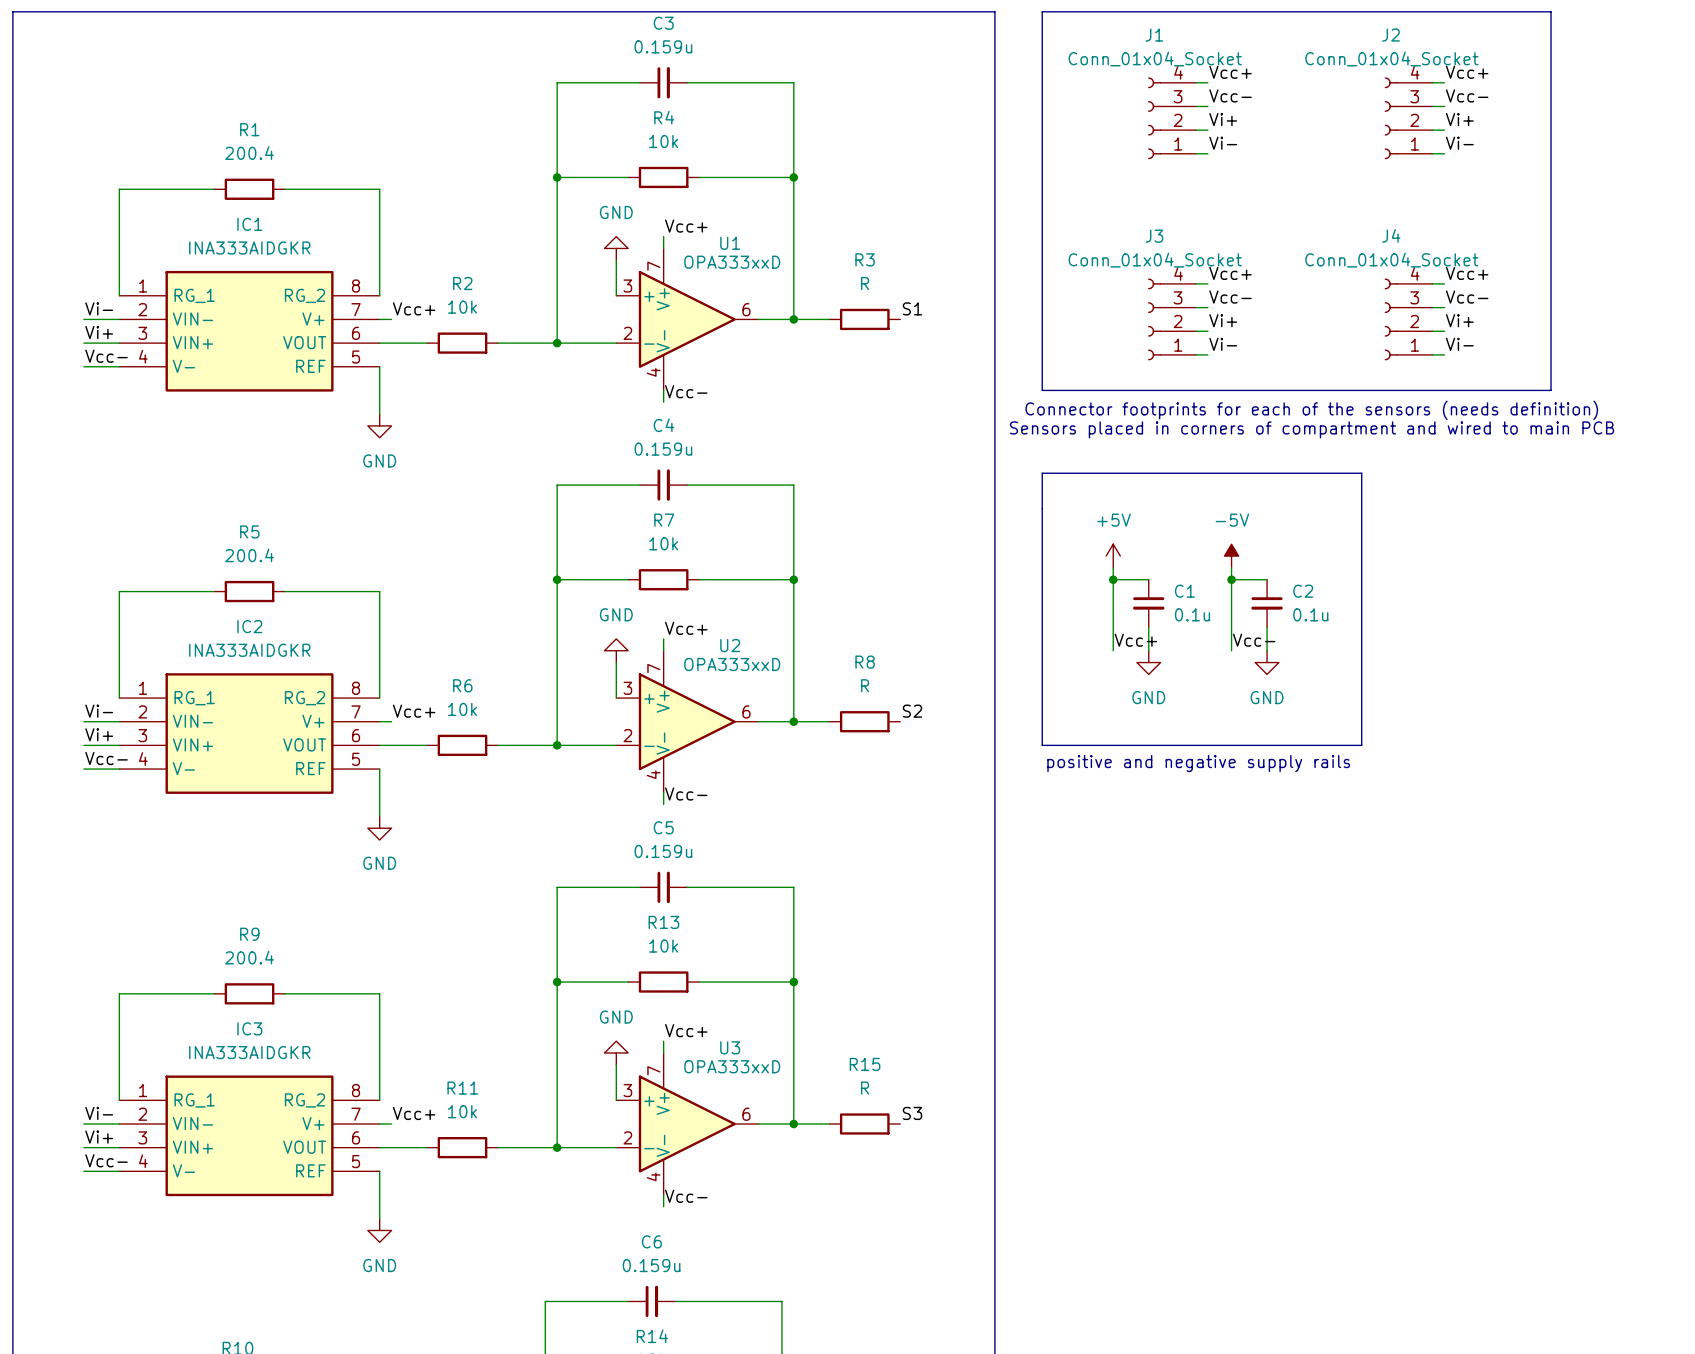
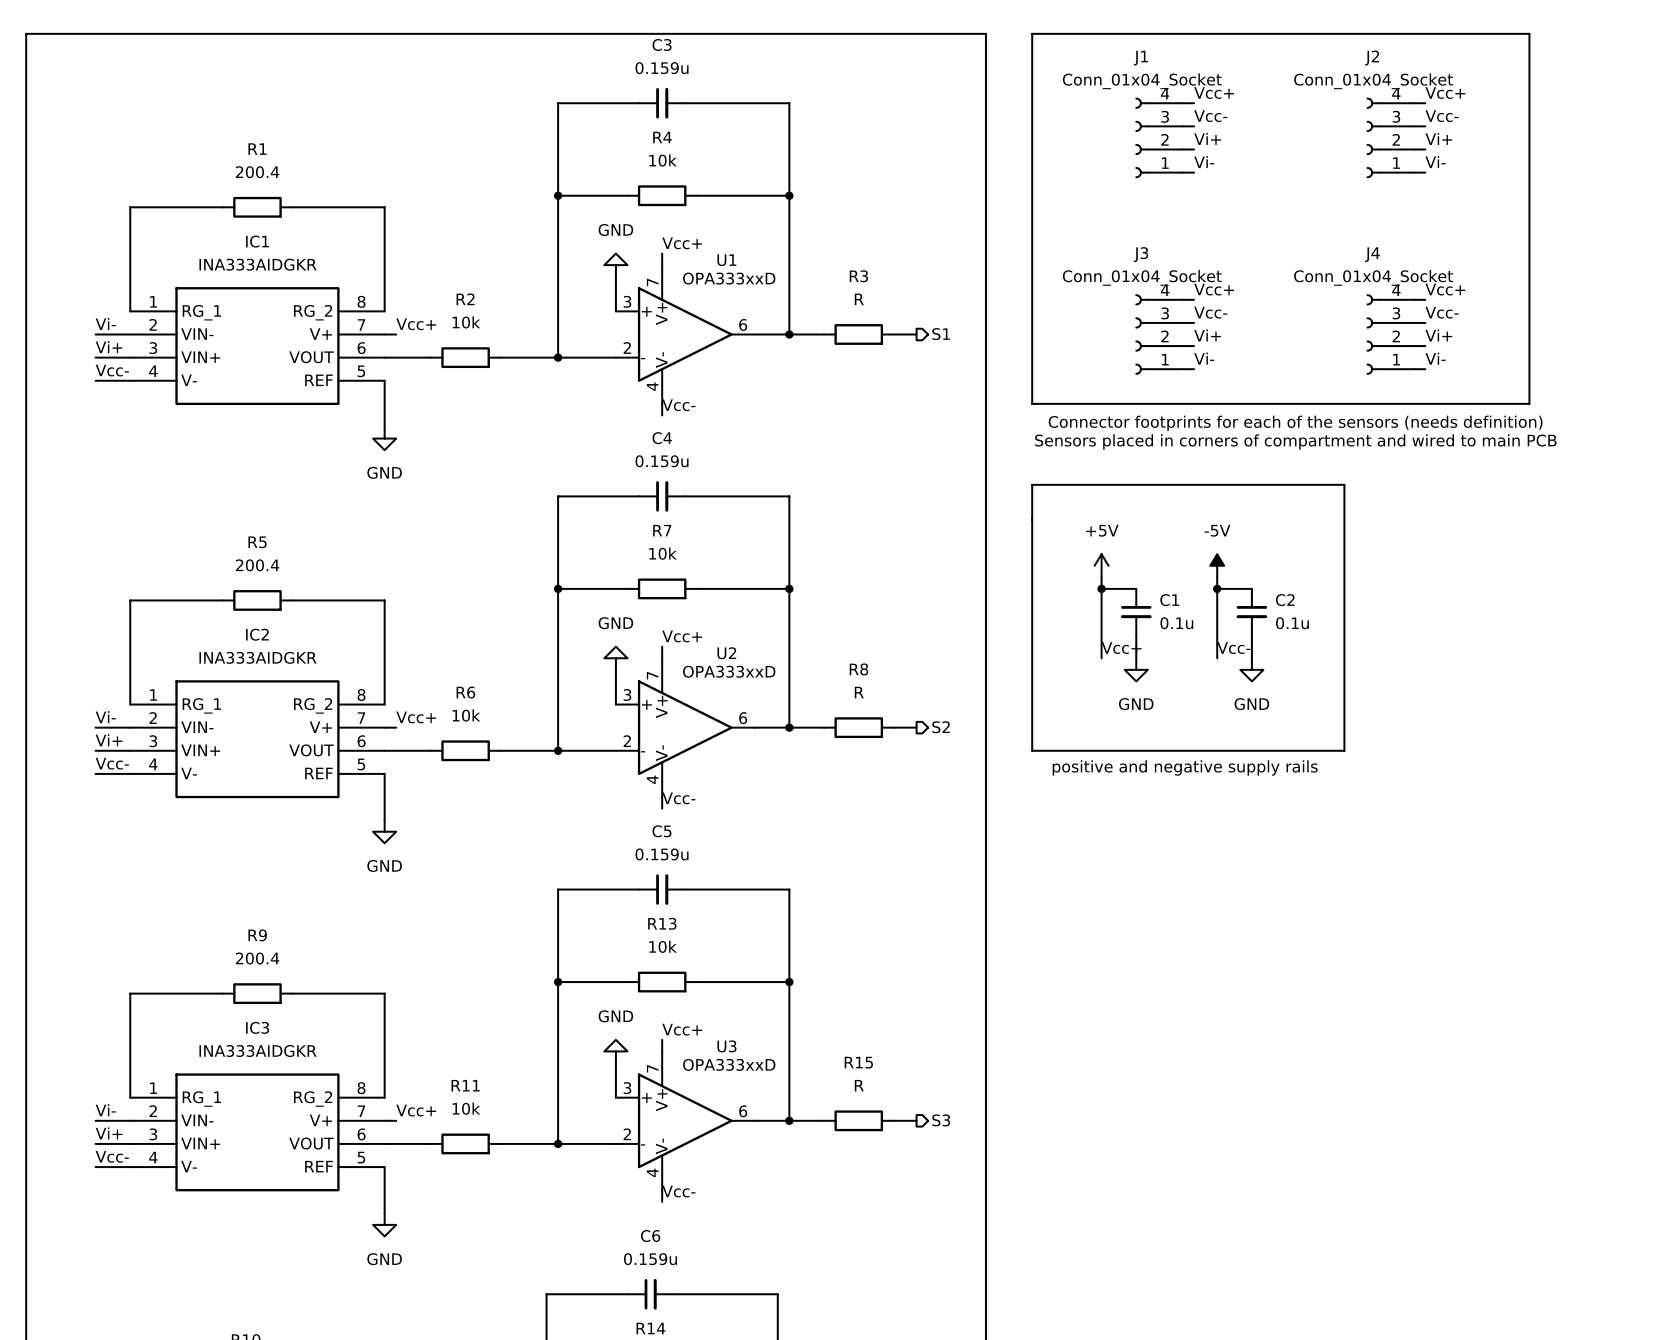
label: S1 (912, 308) -> none
hierarchical label: none -> S1 (941, 334)
wire: none -> (893, 334) (916, 334)
label: S2 (912, 711) -> none
wire: none -> (893, 727) (916, 727)
hierarchical label: none -> S2 (941, 727)
label: S3 (912, 1113) -> none
wire: none -> (893, 1120) (916, 1120)
hierarchical label: none -> S3 (941, 1120)

